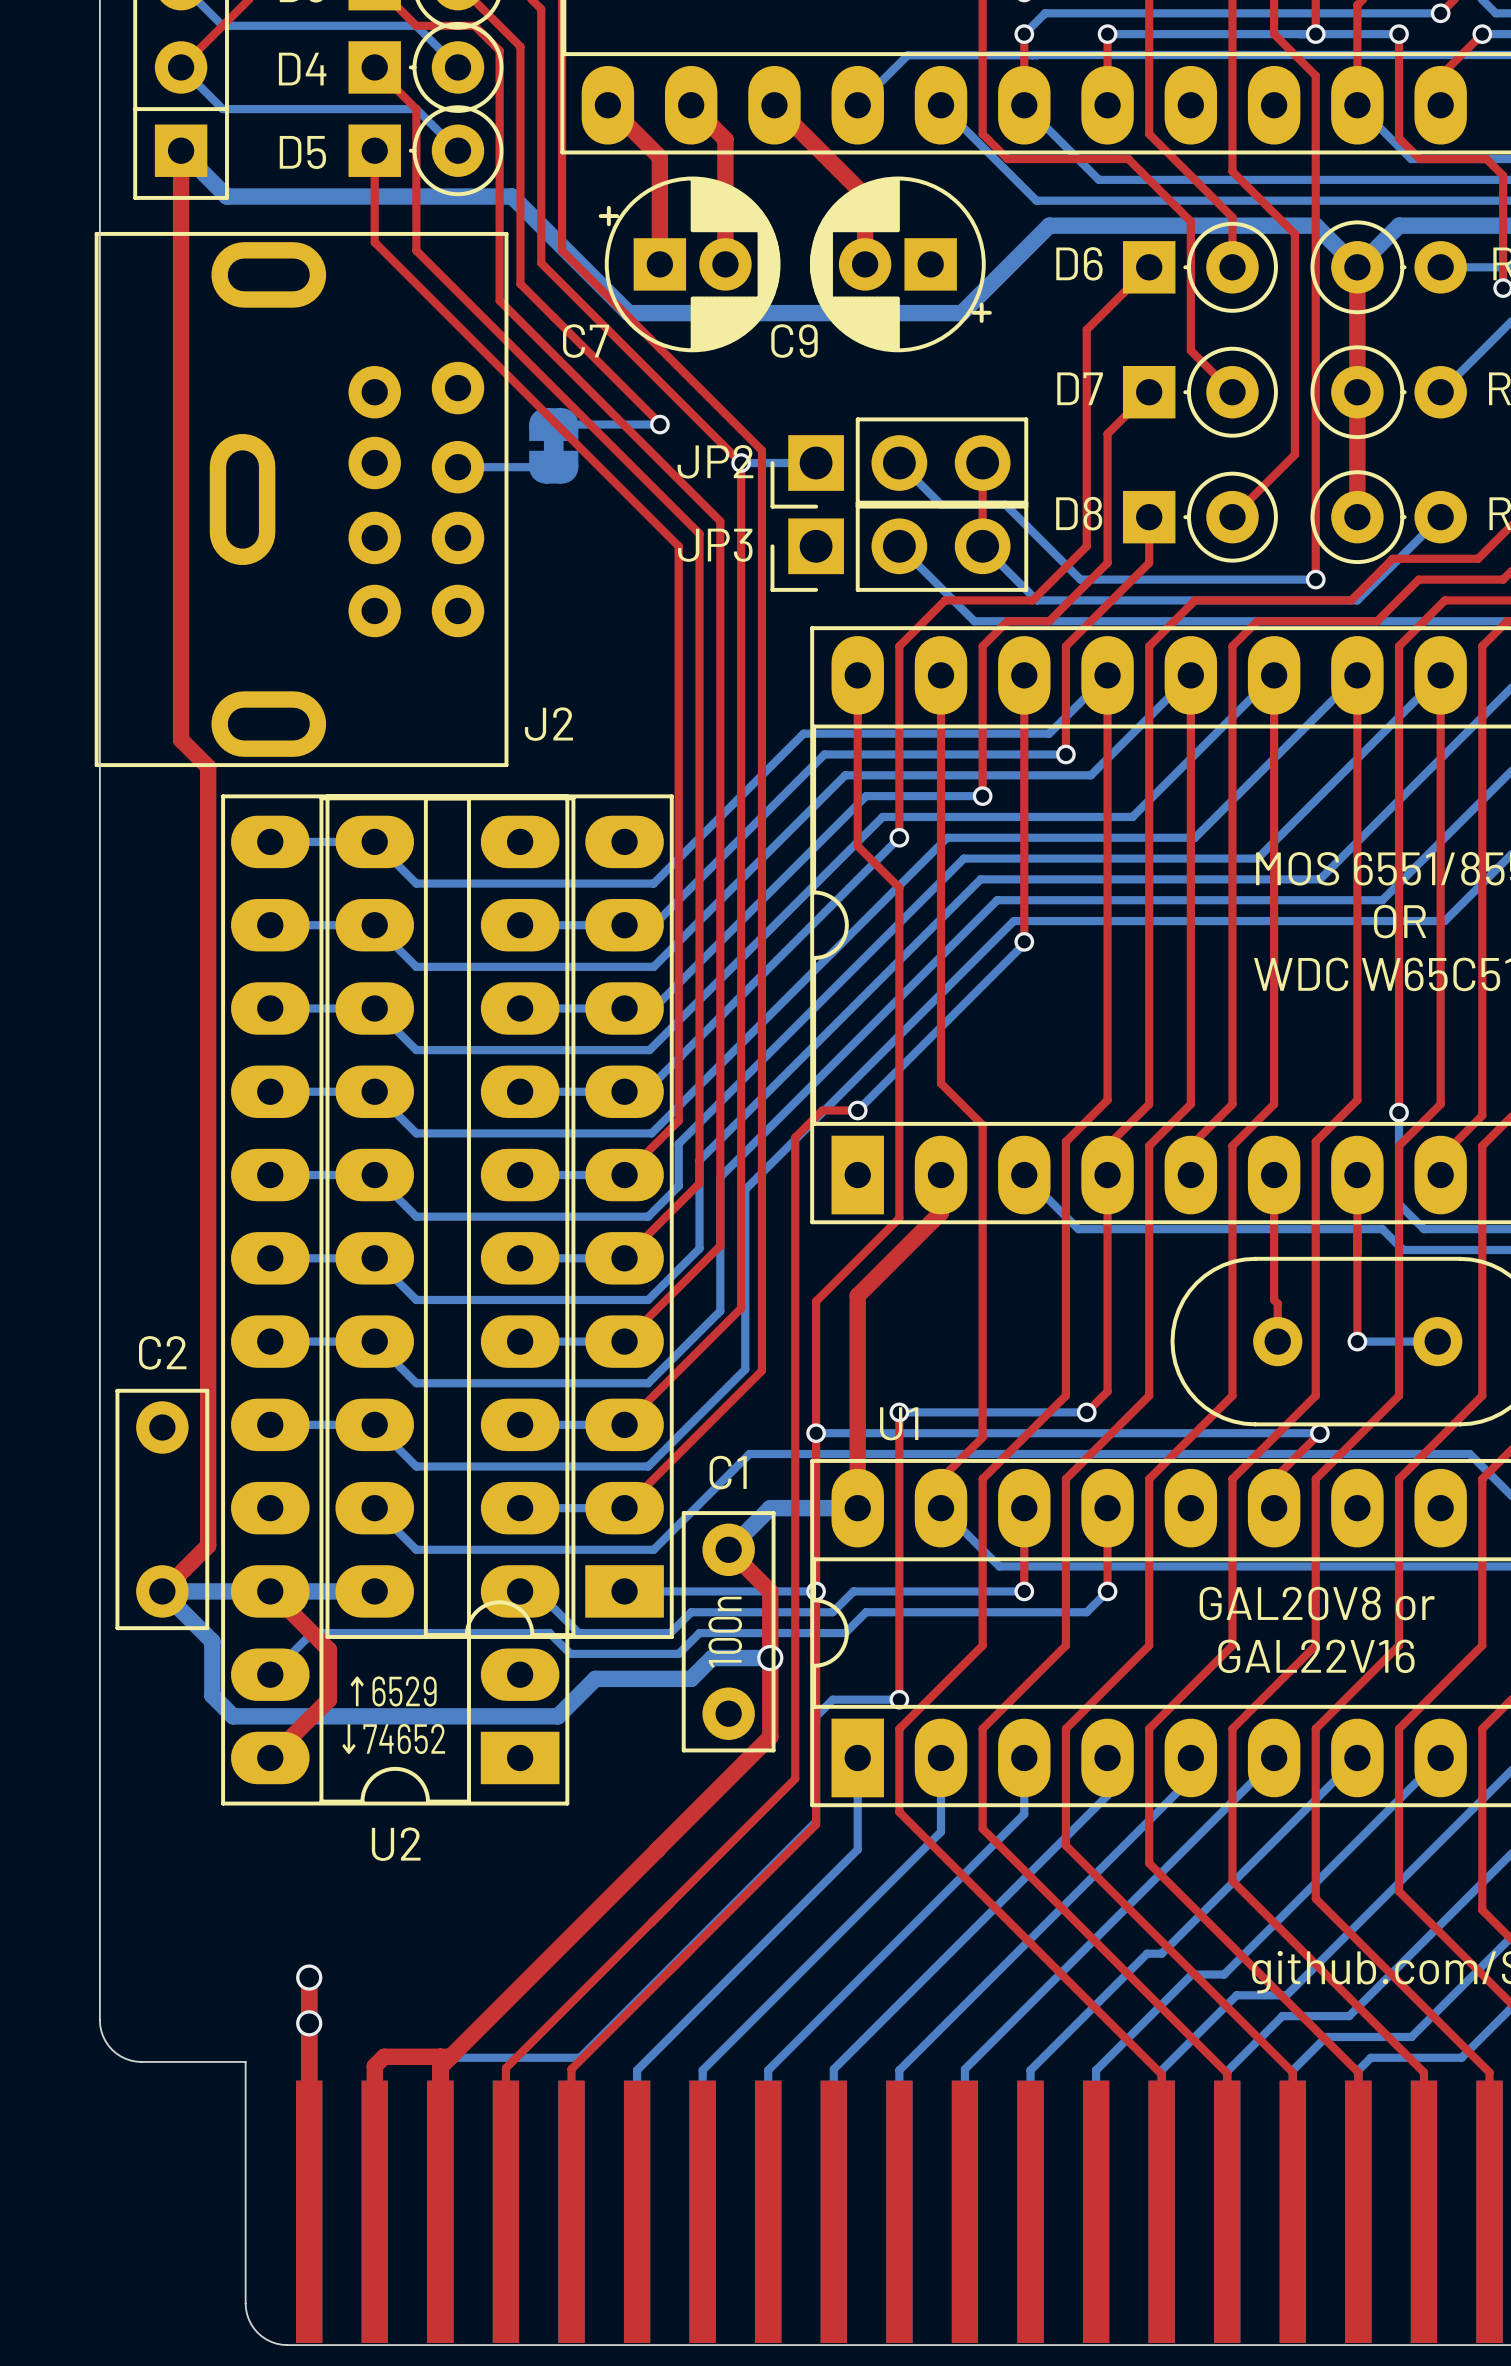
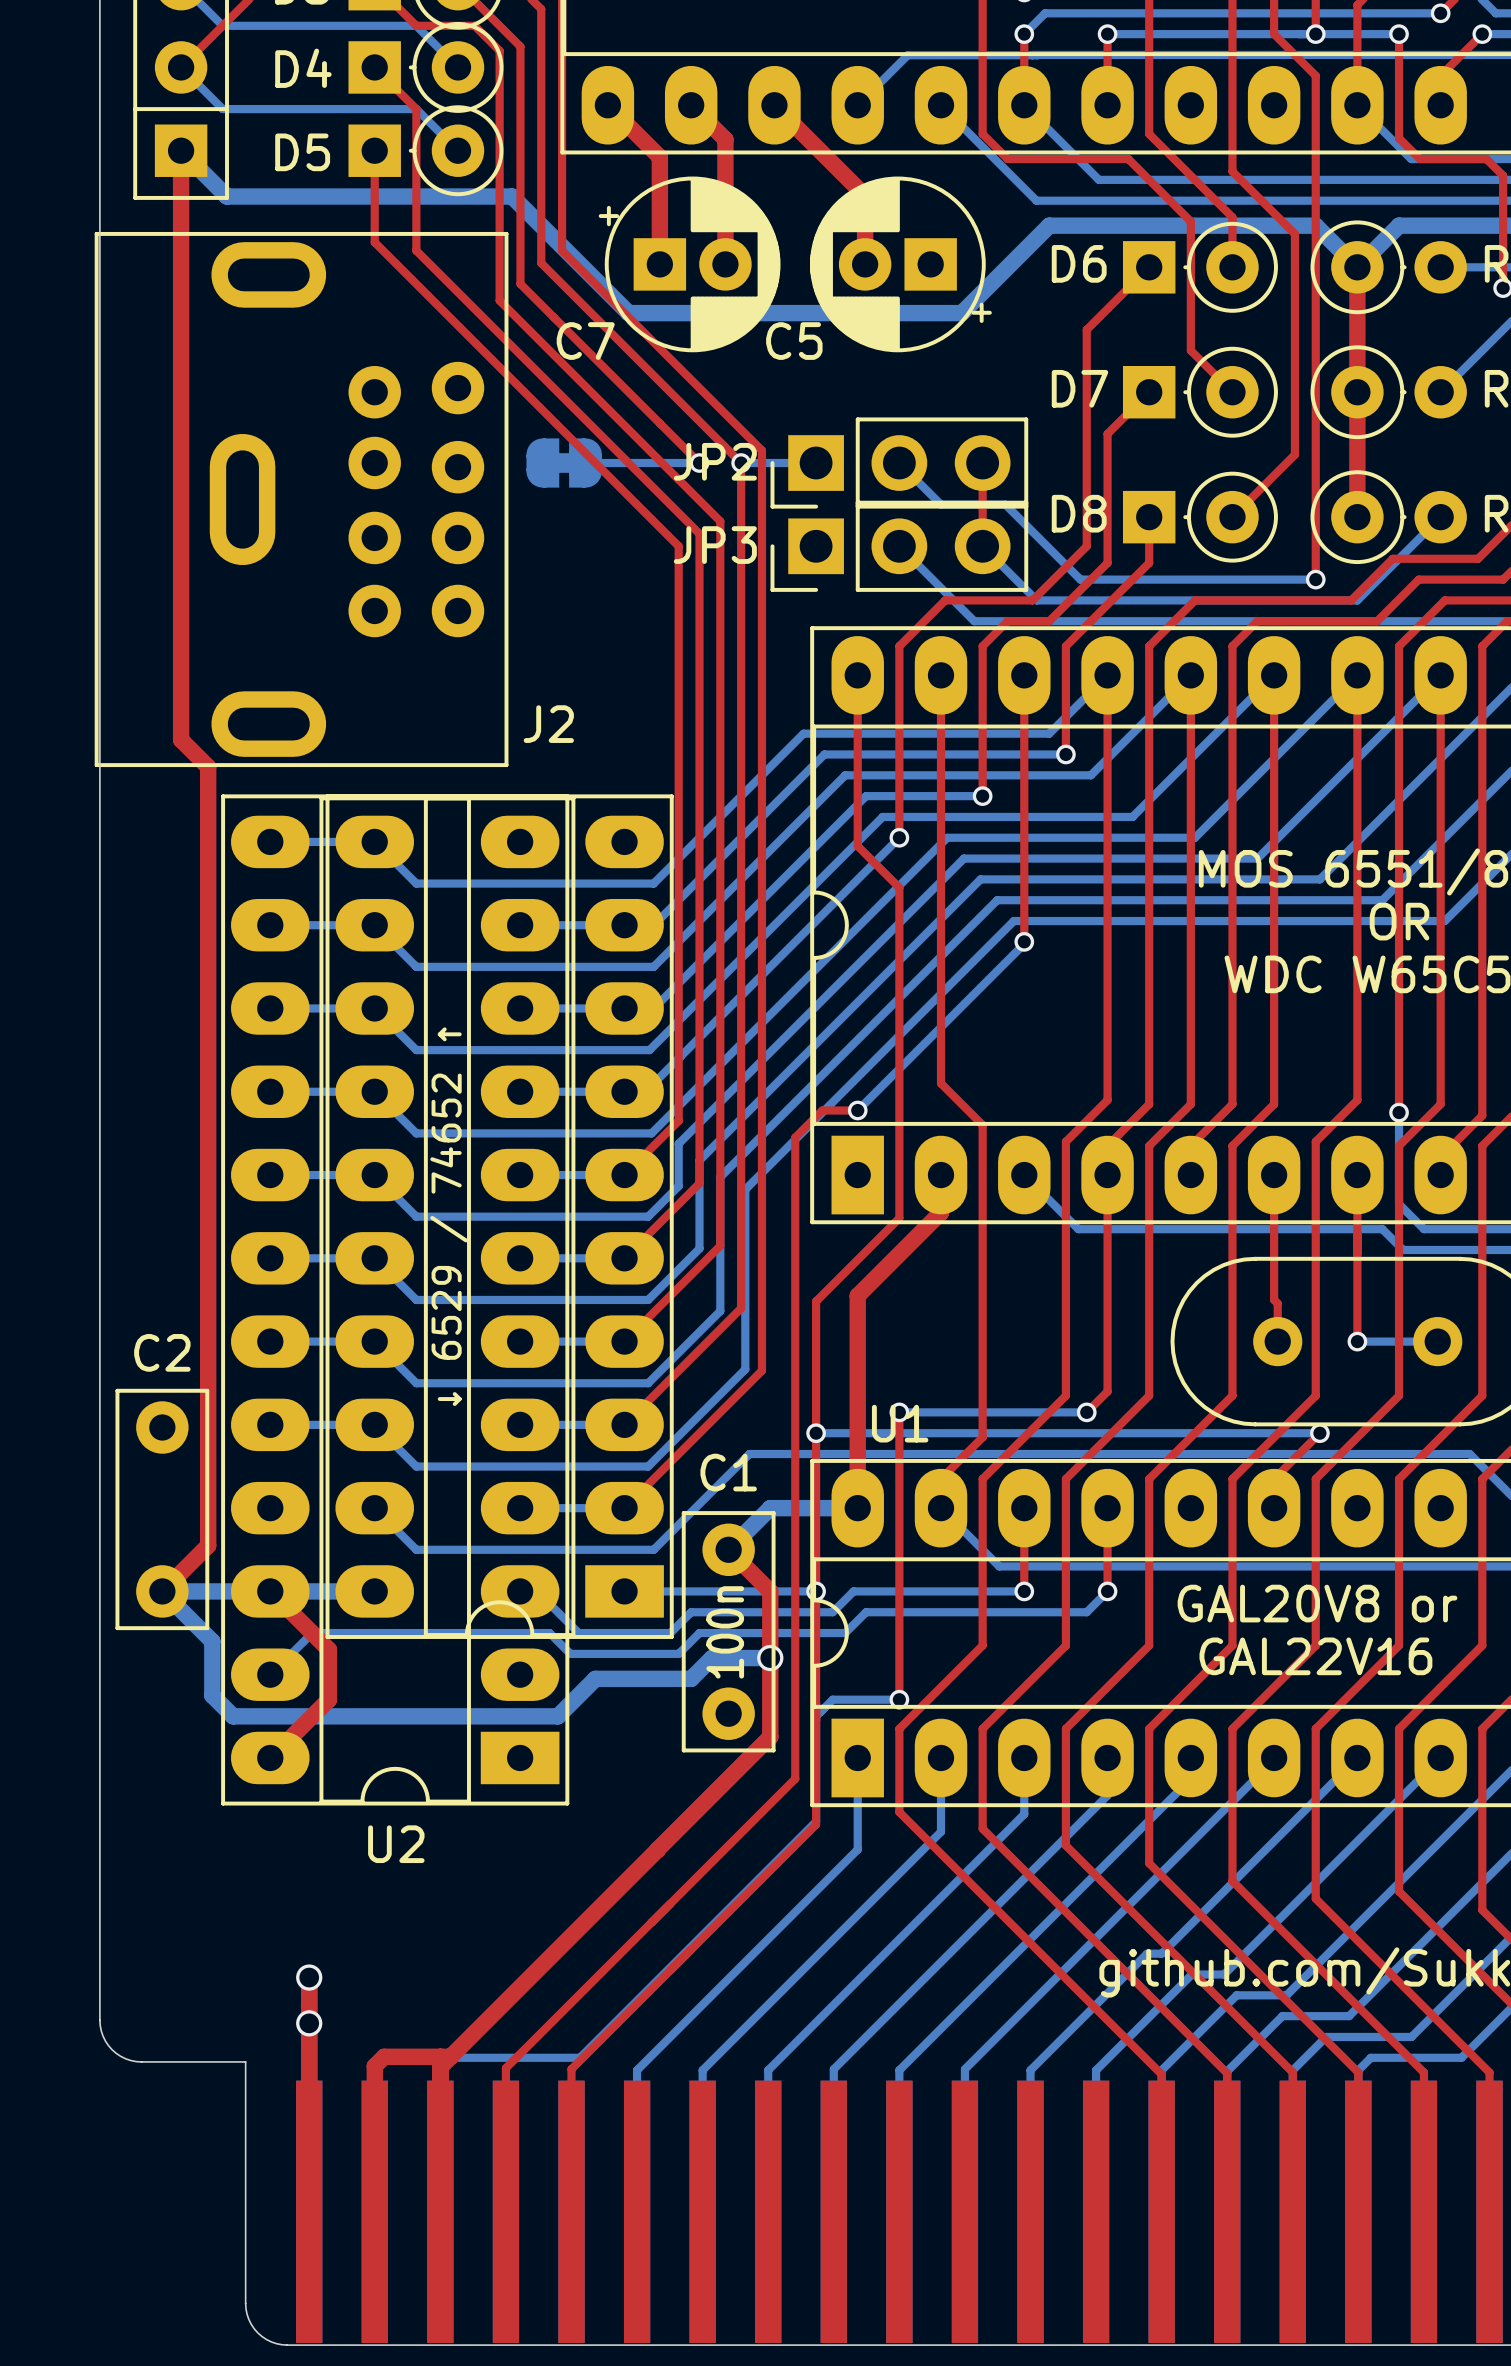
C9 name: C9 (794, 341) -> C5 (794, 341)
top track: none -> (659, 423) (699, 463)
bottom track: (659, 423) (553, 424) -> none
via position: (659, 424) -> (699, 463)
part rotation: 0° (553, 445) -> 90° clockwise (564, 463)
bottom track: none -> (585, 463) (699, 463)
bottom track: (458, 467) (553, 467) -> none
text: none -> ↓ 6529 / 74652 ↑ (449, 1216)
text: ↑6529 (393, 1691) -> none
text: ↓74652 (393, 1738) -> none

